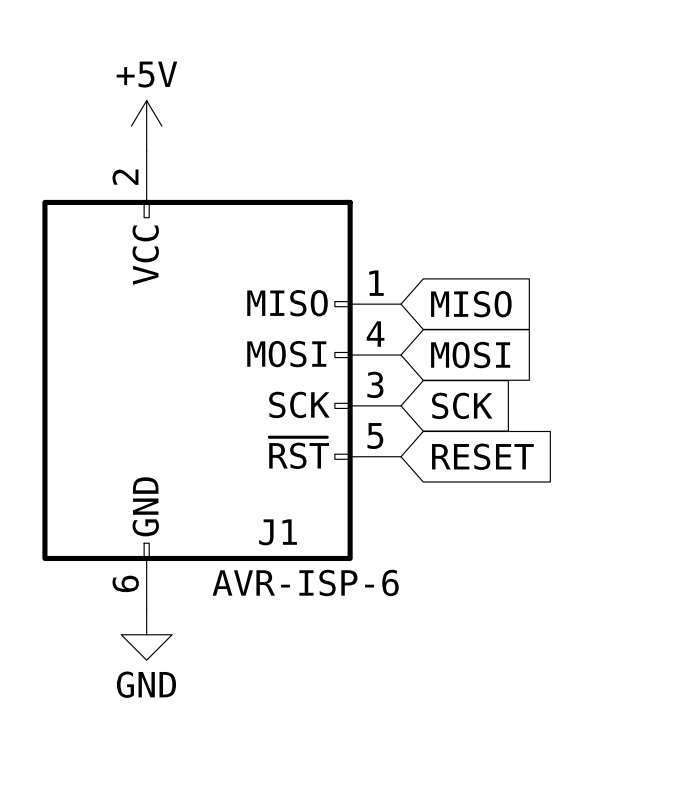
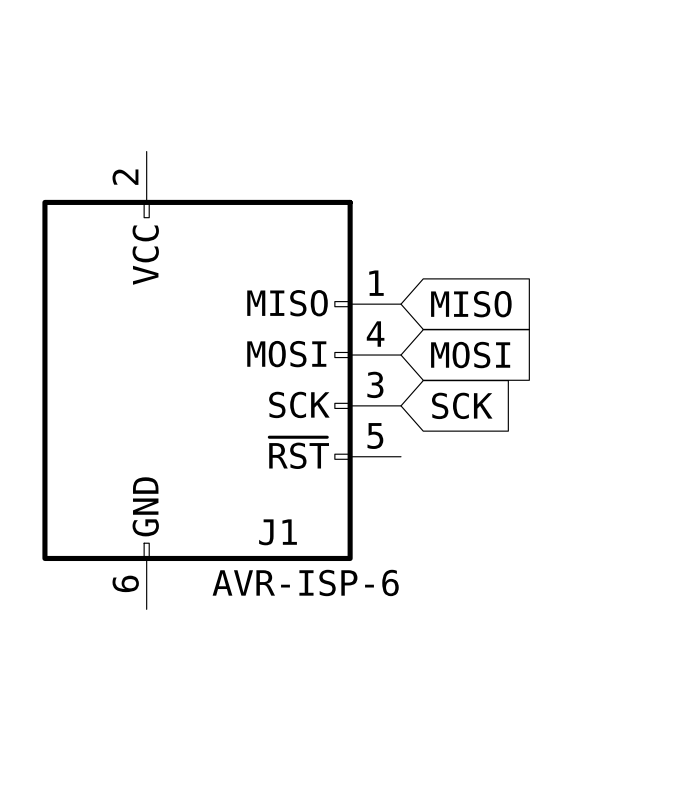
power symbol: +5V (146, 126) -> none
global label: RESET (482, 456) -> none
power symbol: GND (146, 634) -> none

